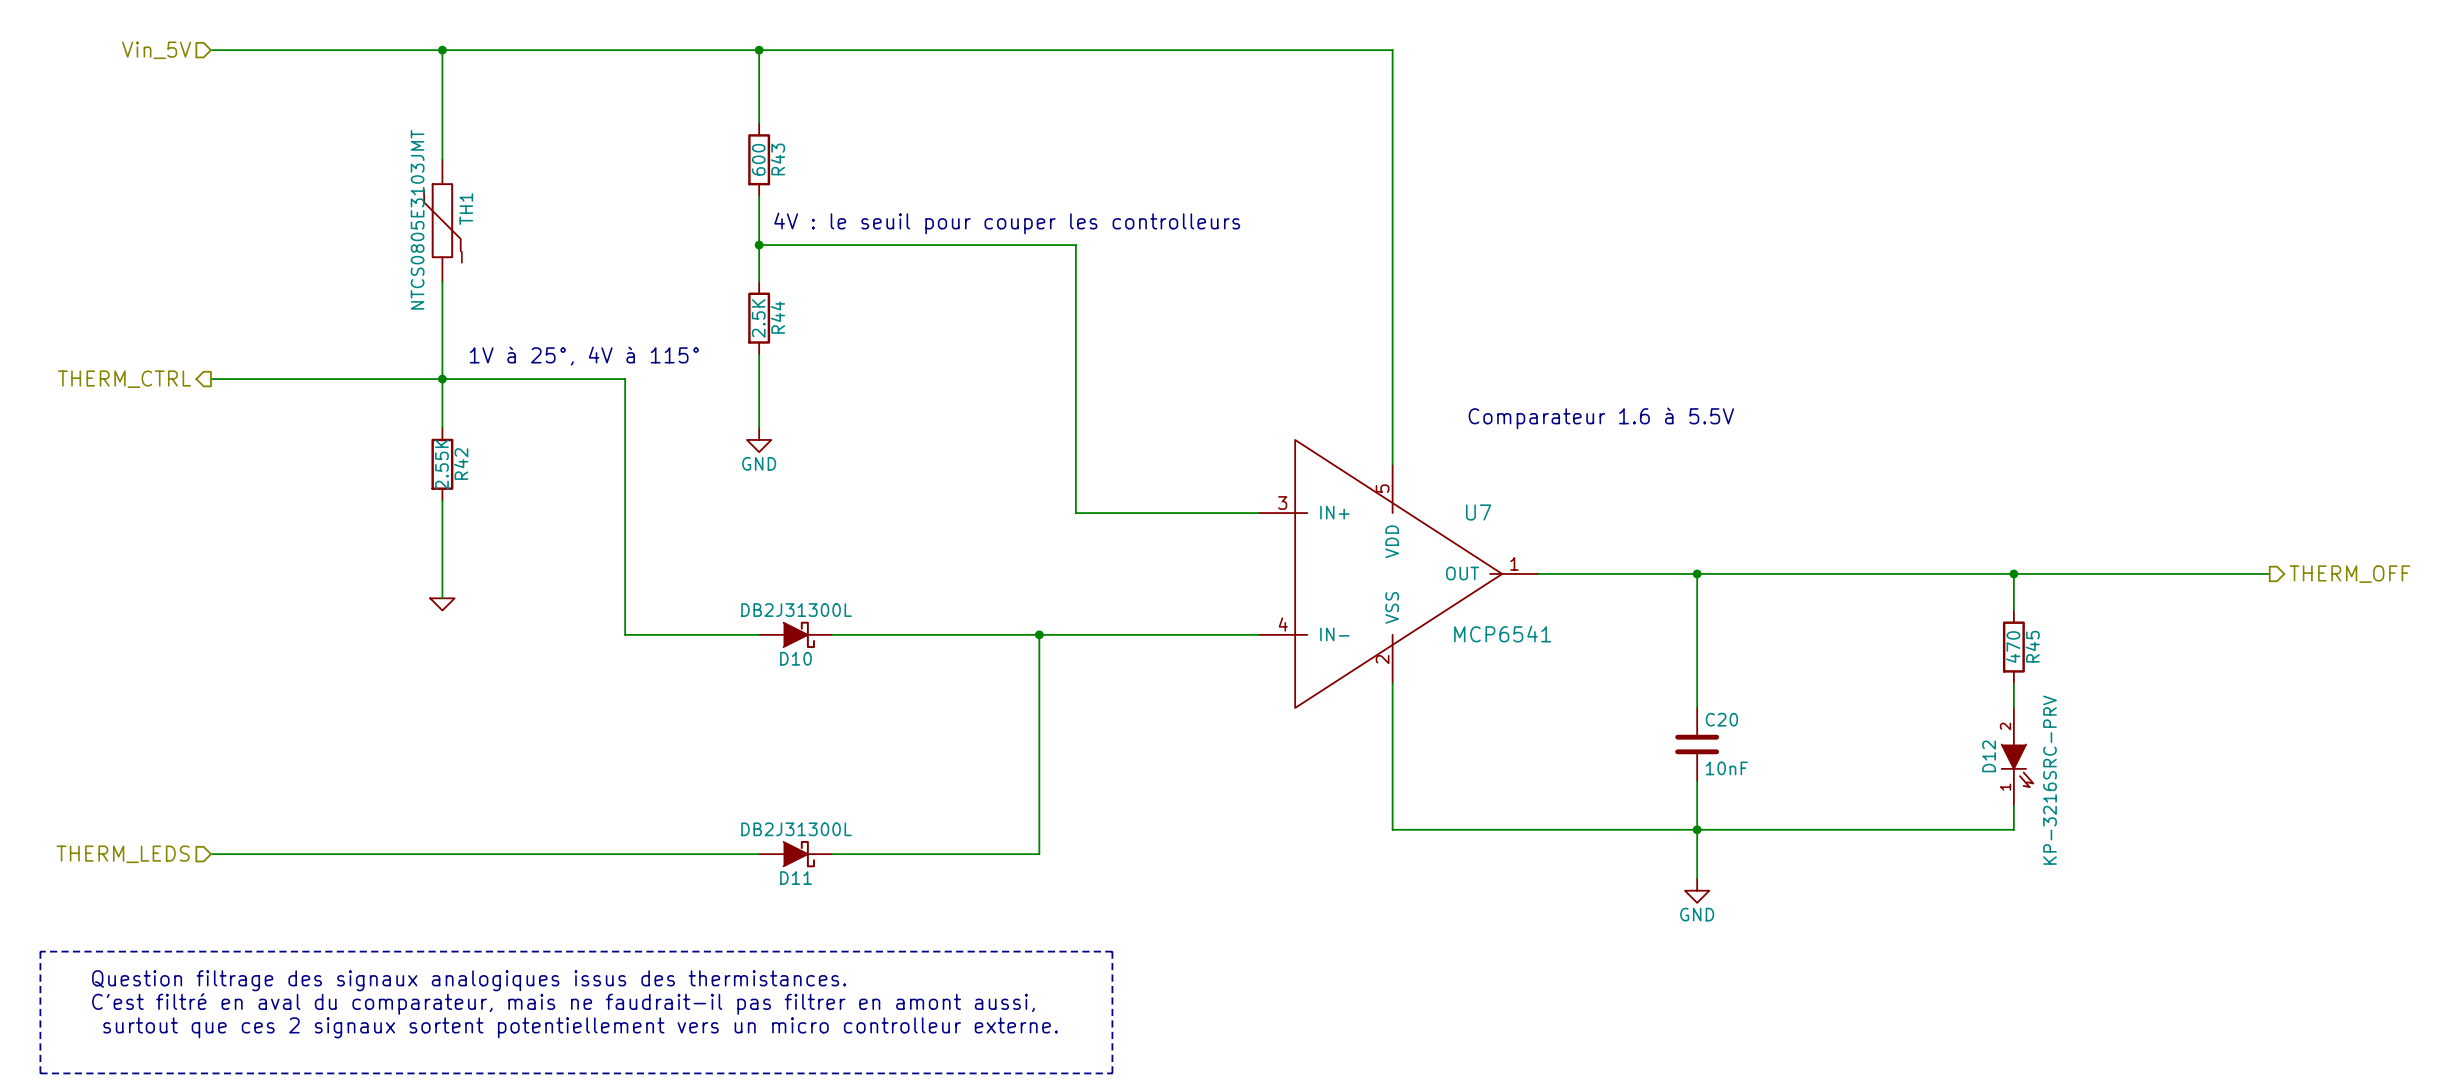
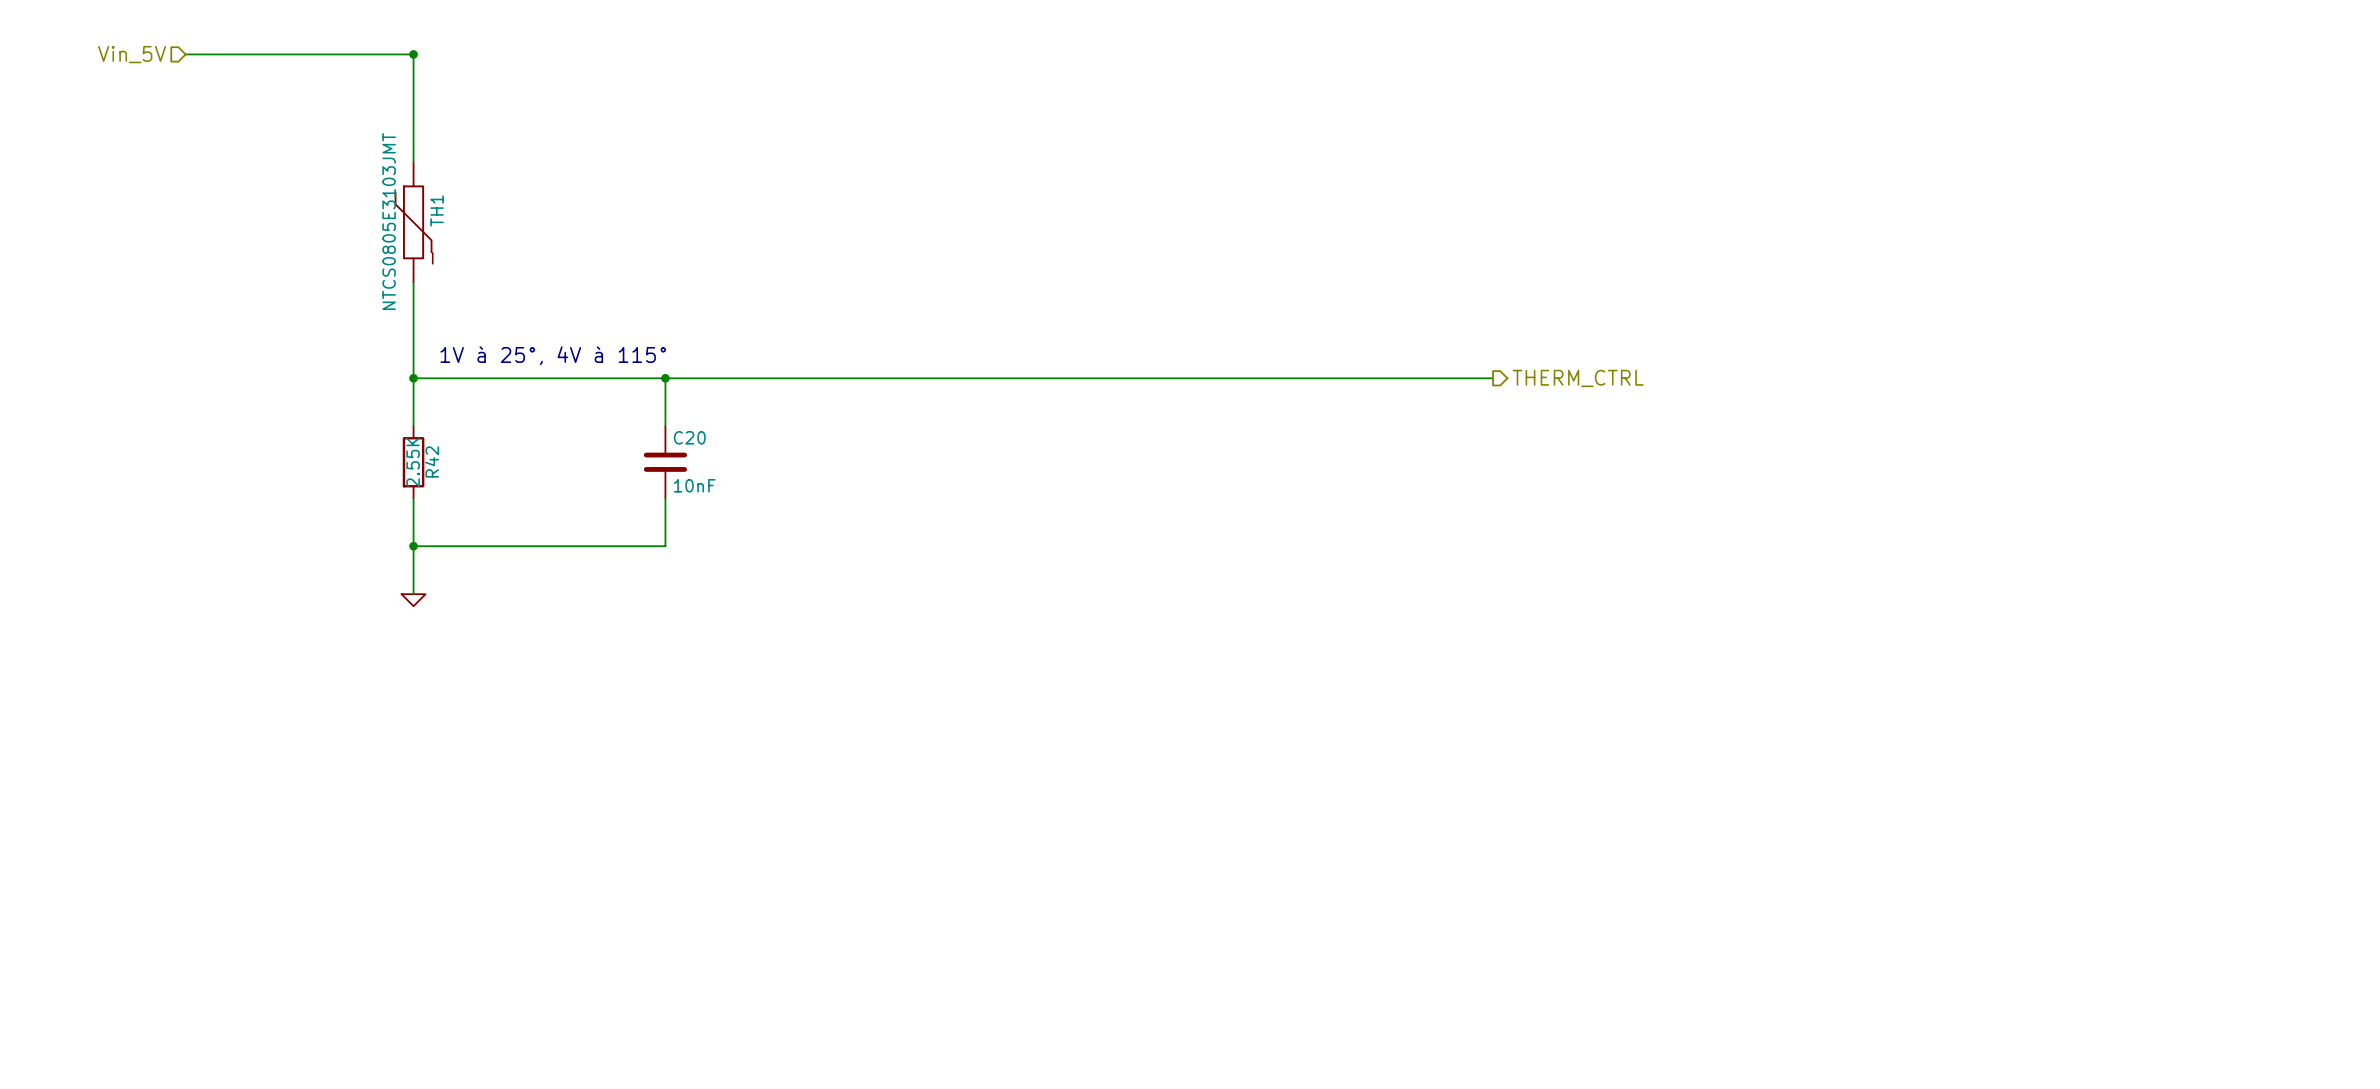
wire: (442, 50) (1392, 50) (1392, 464) -> none
wire: (759, 50) (759, 123) -> none
junction: (759, 50) -> none
R43: 600 (759, 159) -> none
wire: (759, 196) (759, 281) -> none
text: 4V : le seuil pour couper les controlleurs (1007, 223) -> none
wire: (759, 245) (1075, 245) (1075, 513) (1258, 513) -> none
junction: (759, 245) -> none
R44: 2.5K (759, 318) -> none
wire: (759, 354) (759, 427) -> none
hierarchical label: THERM_CTRL (124, 379) -> none
wire: (210, 379) (442, 379) -> none
wire: (625, 379) (625, 634) (759, 634) -> (593, 378) (1493, 378)
wire: none -> (665, 378) (665, 426)
junction: none -> (665, 378)
hierarchical label: none -> THERM_CTRL (1578, 378)
text: Comparateur 1.6 à 5.5V (1601, 418) -> none
power symbol: GND (759, 439) -> none
wire: none -> (665, 498) (665, 546) (413, 546)
junction: none -> (413, 546)
U7: MCP6541 (1398, 573) -> none
wire: (1538, 573) (2269, 573) -> none
wire: (1697, 573) (1697, 707) -> none
junction: (1697, 573) -> none
wire: (2013, 573) (2013, 610) -> none
junction: (2013, 573) -> none
hierarchical label: THERM_OFF (2349, 574) -> none
D10: DB2J31300L (795, 634) -> none
wire: (832, 634) (1258, 634) -> none
wire: (1039, 634) (1039, 854) (832, 854) -> none
junction: (1039, 634) -> none
R45: 470 (2013, 647) -> none
wire: (1392, 683) (1392, 829) (2013, 829) (2013, 805) -> none
wire: (2013, 683) (2013, 707) -> none
C20 position: (1697, 744) -> (665, 462)
D12: KP-3216SRC-PRV (2017, 756) -> none
wire: (1697, 781) (1697, 878) -> none
junction: (1697, 829) -> none
hierarchical label: THERM_LEDS (123, 854) -> none
wire: (210, 854) (759, 854) -> none
D11: DB2J31300L (795, 854) -> none
power symbol: GND (1697, 890) -> none
line: (40, 951) (1112, 951) (1112, 1073) (40, 1073) (40, 951) -> none
text: Question filtrage des signaux analogiques issus des thermistances. (469, 980) -> none
text: C'est filtré en aval du comparateur, mais ne faudrait-il pas filtrer en amont aussi, (563, 1003) -> none
text: surtout que ces 2 signaux sortent potentiellement vers un micro controlleur externe. (580, 1027) -> none

